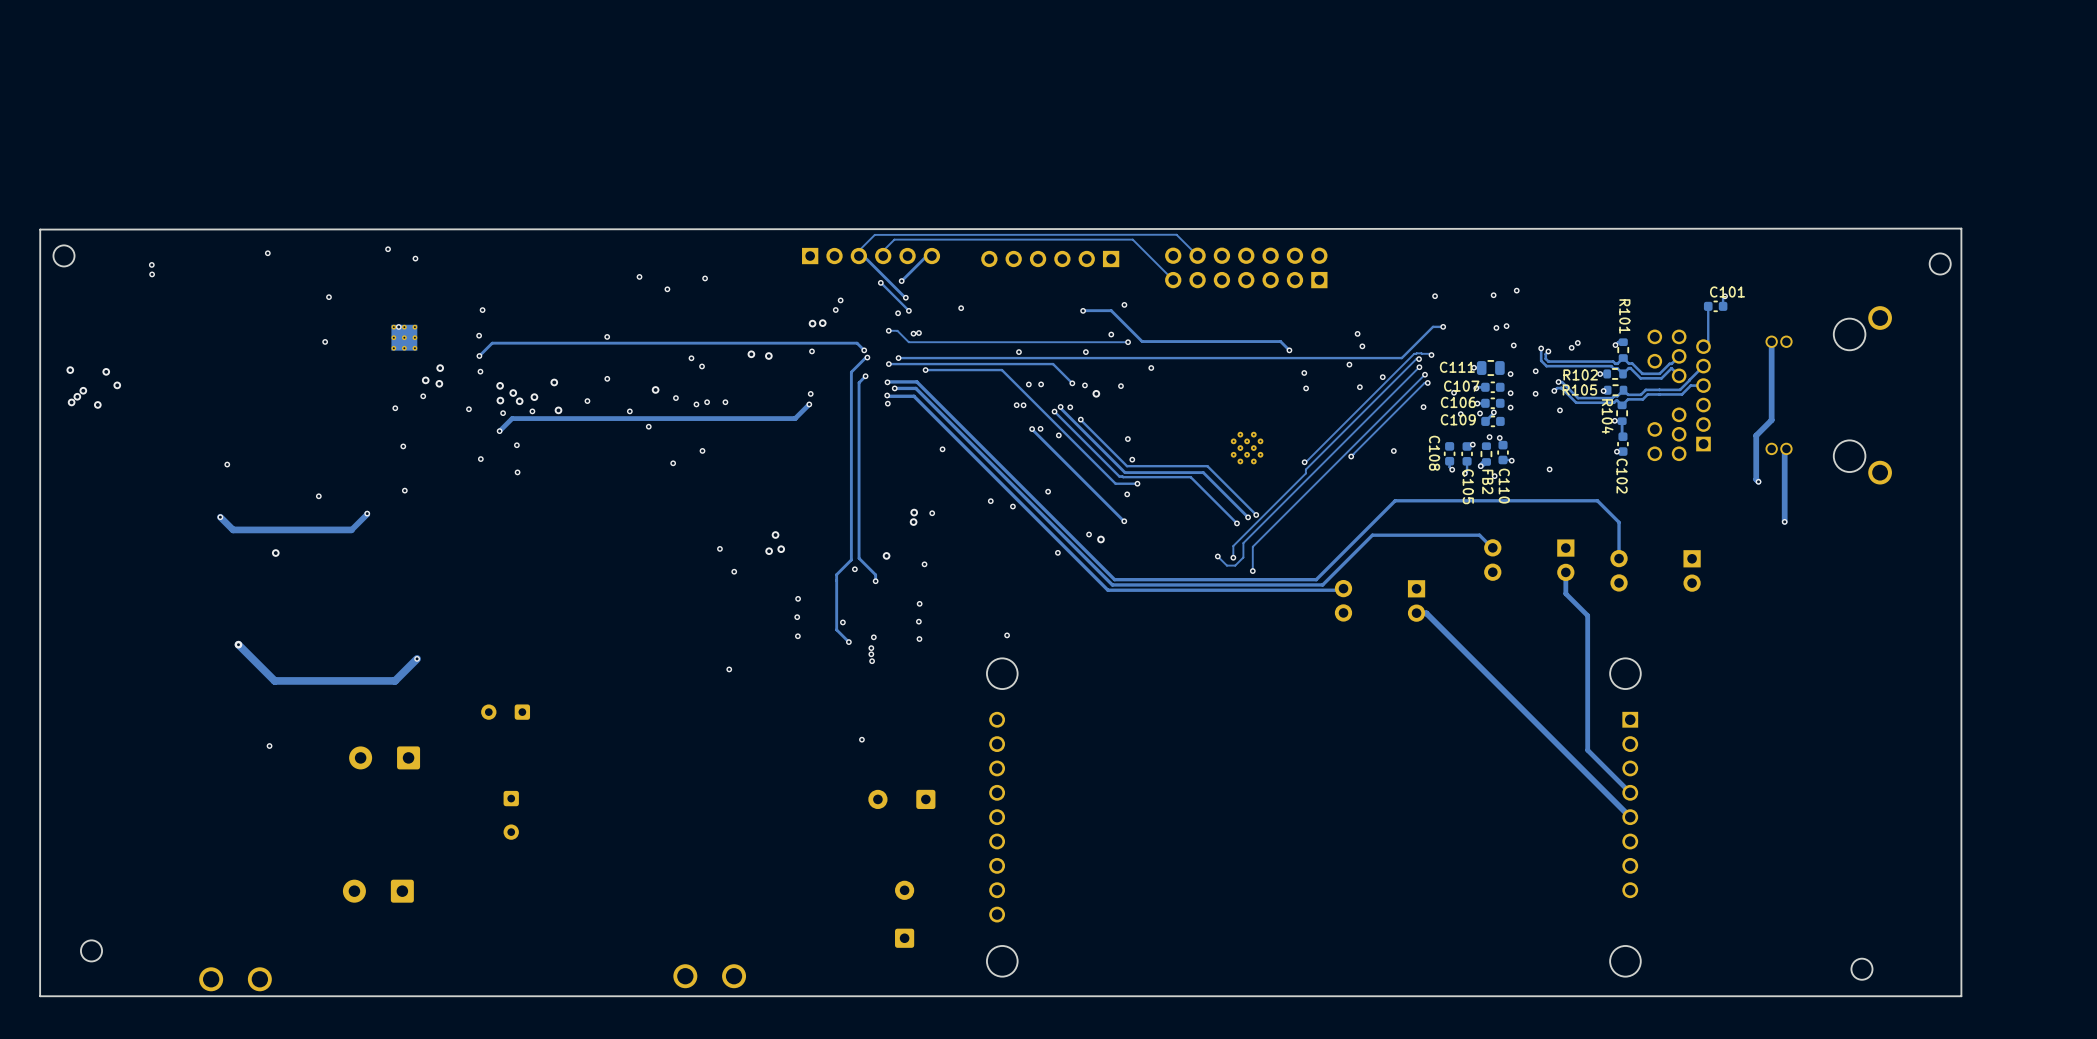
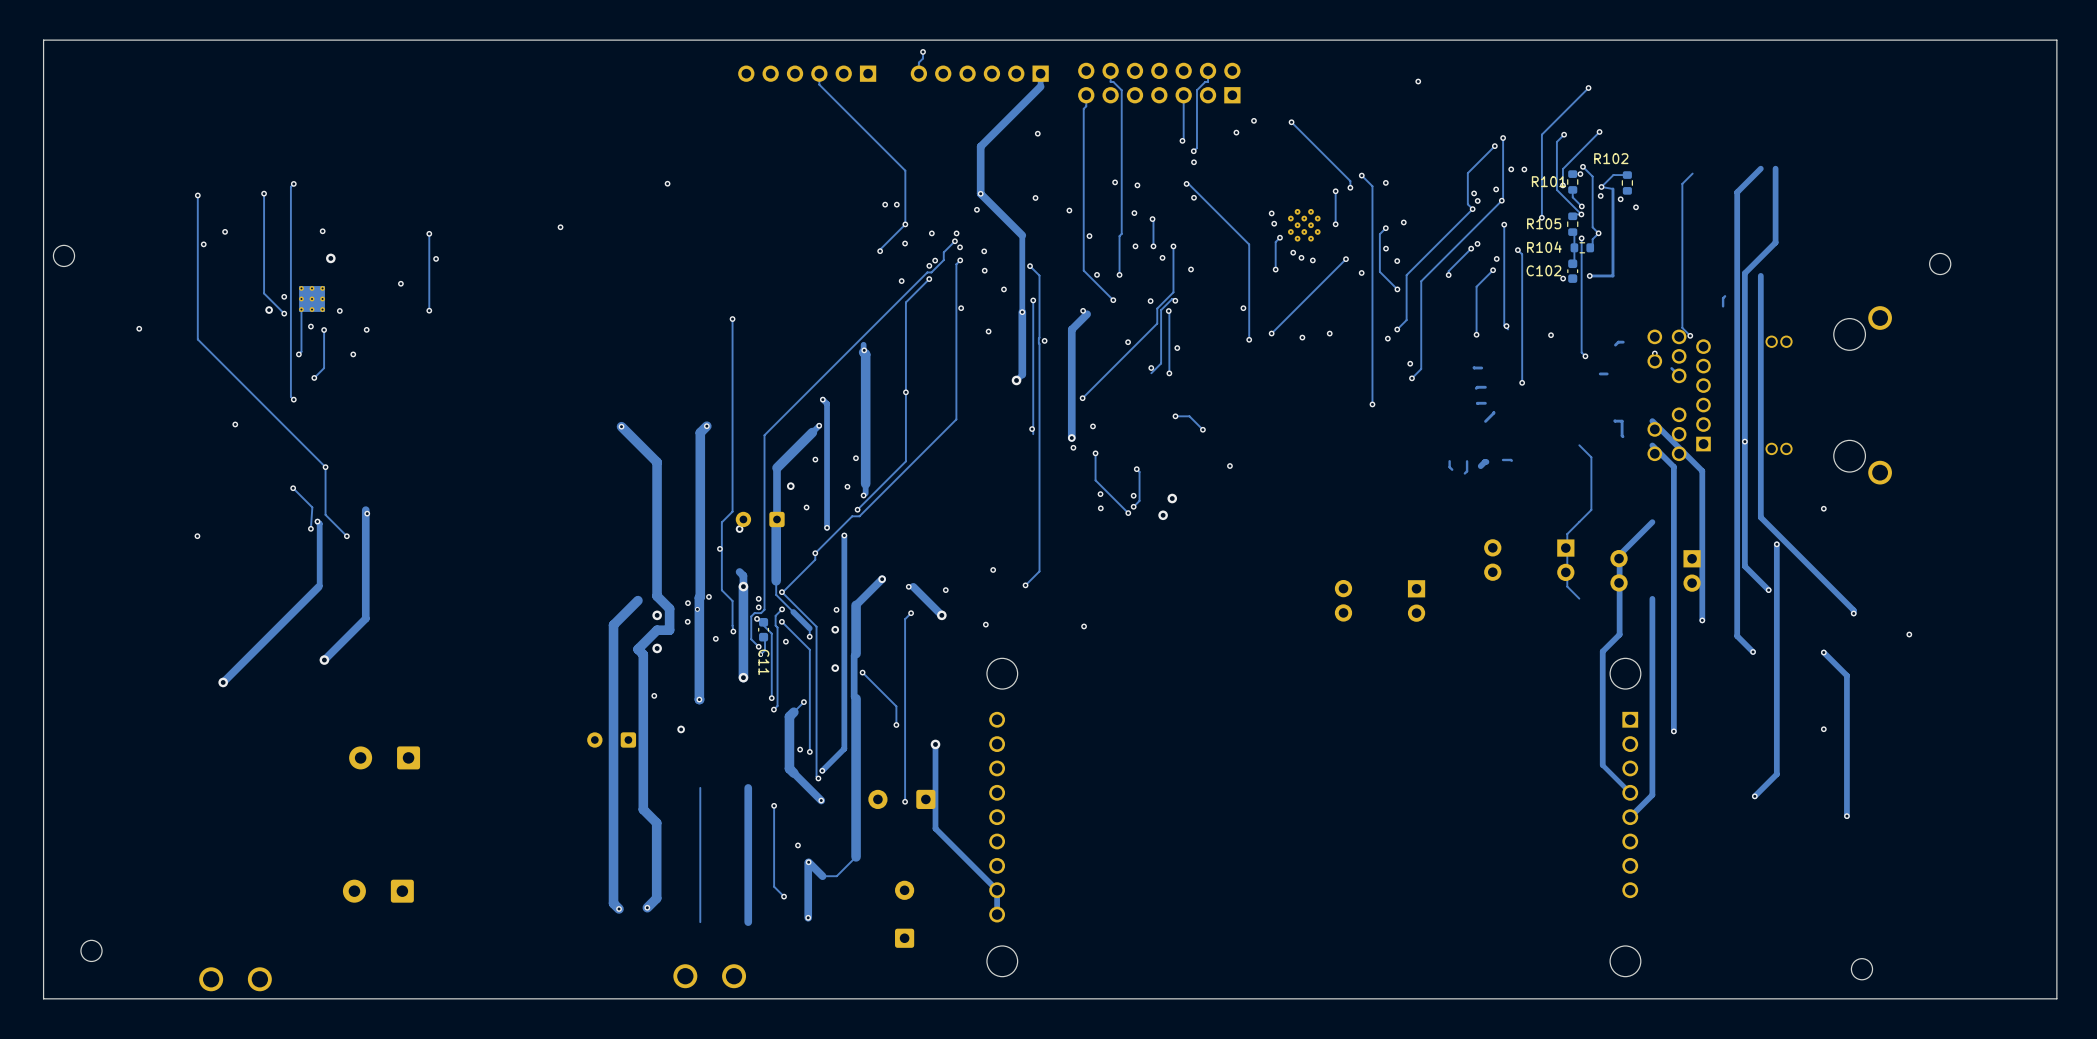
track: none -> (923, 51) (923, 58) (918, 62) (918, 73)
via: none -> (923, 51)
track: none -> (1110, 70) (1110, 81) (1113, 81) (1121, 90) (1121, 233) (1119, 236) (1119, 274)
track: none -> (1208, 70) (1208, 81) (1205, 81) (1196, 90) (1196, 148) (1193, 151)
part: none -> (807, 73)
track: none -> (819, 73) (819, 84) (905, 170) (905, 224) (880, 251)
part: none -> (979, 73)
track: none -> (1040, 73) (1040, 86) (980, 146) (980, 193) (1022, 235) (1022, 374) (1016, 380)
via: none -> (1418, 81)
track: none -> (1588, 88) (1541, 134) (1541, 217)
via: none -> (1588, 88)
track: none -> (1086, 95) (1086, 106) (1083, 108) (1083, 270) (1113, 300)
track: none -> (1183, 95) (1182, 140)
via: none -> (1253, 120)
track: none -> (1291, 122) (1350, 181) (1350, 187)
via: none -> (1291, 122)
track: none -> (1599, 131) (1562, 169) (1562, 185)
via: none -> (1599, 131)
via: none -> (1236, 132)
via: none -> (1037, 133)
track: none -> (1564, 134) (1556, 141) (1556, 189) (1581, 214) (1572, 216)
via: none -> (1564, 134)
track: none -> (1503, 138) (1503, 199) (1421, 281) (1421, 369) (1411, 378)
via: none -> (1503, 138)
via: none -> (1182, 140)
track: none -> (1494, 146) (1467, 173) (1467, 204) (1472, 209) (1406, 275) (1406, 320) (1397, 329)
via: none -> (1494, 146)
via: none -> (1193, 151)
via: none -> (1193, 162)
track: none -> (1582, 166) (1592, 176) (1592, 227) (1598, 233) (1592, 239) (1592, 245) (1590, 247)
via: none -> (1582, 166)
track: none -> (1760, 168) (1737, 192) (1737, 636) (1753, 651)
track: none -> (1775, 168) (1775, 242) (1744, 273) (1744, 566) (1768, 590)
via: none -> (1511, 169)
via: none -> (1524, 169)
track: none -> (1692, 173) (1682, 183) (1682, 327) (1690, 335)
via: none -> (1580, 174)
track: none -> (1361, 175) (1372, 186) (1372, 404)
via: none -> (1361, 175)
track: none -> (1627, 175) (1613, 175) (1601, 186) (1612, 188) (1612, 275) (1589, 275)
via: none -> (1115, 182)
via: none -> (1385, 182)
track: none -> (293, 183) (290, 186) (290, 396) (293, 399)
via: none -> (293, 183)
via: none -> (667, 183)
track: none -> (1186, 183) (1249, 244) (1249, 339)
via: none -> (1186, 183)
via: none -> (1137, 185)
via: none -> (1562, 185)
via: none -> (1601, 186)
via: none -> (1350, 187)
via: none -> (1496, 189)
track: none -> (1572, 189) (1572, 197) (1581, 206)
track: none -> (1335, 191) (1335, 224)
via: none -> (1335, 191)
track: none -> (264, 193) (264, 293) (284, 313)
via: none -> (264, 193)
via: none -> (980, 193)
via: none -> (1474, 193)
track: none -> (197, 195) (197, 339) (325, 467) (325, 514) (346, 536)
via: none -> (197, 195)
via: none -> (1600, 195)
via: none -> (1035, 197)
via: none -> (1193, 197)
via: none -> (1620, 199)
via: none -> (1477, 200)
via: none -> (1501, 200)
via: none -> (885, 204)
via: none -> (896, 204)
via: none -> (1581, 206)
via: none -> (1636, 207)
via: none -> (976, 209)
via: none -> (1472, 209)
via: none -> (1069, 210)
via: none -> (1134, 213)
via: none -> (1271, 213)
via: none -> (1581, 214)
via: none -> (1541, 217)
track: none -> (1152, 219) (1153, 246)
via: none -> (1152, 219)
via: none -> (1403, 222)
via: none -> (1274, 223)
via: none -> (905, 224)
via: none -> (1335, 224)
track: none -> (1504, 224) (1504, 325) (1508, 329)
via: none -> (1504, 224)
via: none -> (560, 227)
track: none -> (1385, 228) (1379, 234) (1379, 271) (1397, 289)
via: none -> (1385, 228)
board edge: (1961, 228) (40, 229) (40, 996) (1961, 996) (1961, 228) -> (2056, 40) (2056, 998) (43, 998) (43, 40) (2056, 40)
via: none -> (225, 231)
via: none -> (322, 231)
track: none -> (1572, 232) (1574, 233) (1574, 262) (1572, 263)
track: none -> (429, 233) (429, 310)
via: none -> (429, 233)
via: none -> (931, 233)
via: none -> (956, 233)
via: none -> (1598, 233)
via: none -> (1089, 236)
track: none -> (1279, 237) (1275, 242) (1275, 269)
via: none -> (1279, 237)
track: none -> (1581, 238) (1581, 352) (1585, 356)
via: none -> (1581, 238)
track: none -> (954, 241) (943, 252) (943, 260) (931, 272) (927, 272) (764, 435) (764, 609) (751, 616) (751, 639) (758, 646)
via: none -> (954, 241)
via: none -> (905, 243)
via: none -> (1477, 243)
via: none -> (203, 244)
via: none -> (1135, 246)
via: none -> (1153, 246)
track: none -> (1173, 246) (1173, 292) (1157, 308) (1157, 323) (1082, 398)
via: none -> (1173, 246)
via: none -> (960, 247)
via: none -> (1386, 248)
track: none -> (1471, 248) (1448, 271) (1448, 275)
via: none -> (1471, 248)
via: (388, 249) -> none
track: none -> (1517, 250) (1522, 254) (1522, 382)
via: none -> (1517, 250)
via: none -> (880, 251)
via: none -> (984, 251)
via: none -> (1293, 252)
via: (267, 253) -> none
track: (1197, 255) (1176, 234) (874, 234) (858, 250) (858, 256) (863, 256) (905, 297) -> none
part: (871, 256) -> none
track: (883, 256) (883, 250) (894, 239) (1132, 239) (1173, 280) -> none
track: (931, 256) (926, 256) (901, 281) -> none
via: none -> (1162, 257)
via: none -> (1301, 257)
via: none -> (330, 258)
via: (415, 258) -> none
via: none -> (436, 258)
part: (1050, 258) -> none
via: none -> (1496, 258)
track: none -> (1346, 259) (1271, 333)
via: none -> (1346, 259)
via: none -> (935, 260)
track: none -> (960, 260) (956, 264) (956, 419) (859, 516) (852, 516) (815, 553) (815, 559) (781, 592) (816, 626) (816, 776) (818, 778)
via: none -> (960, 260)
via: none -> (1312, 260)
via: none -> (1397, 261)
via: (151, 264) -> none
via: none -> (929, 265)
track: none -> (1030, 266) (1039, 275) (1039, 571) (1025, 585)
via: none -> (1030, 266)
part position: (1246, 267) -> (1159, 83)
via: none -> (1191, 269)
via: none -> (1275, 269)
via: none -> (984, 270)
track: none -> (1493, 270) (1476, 286) (1476, 334)
via: none -> (1493, 270)
via: none -> (1361, 272)
via: (152, 274) -> none
via: none -> (1097, 274)
via: none -> (1119, 274)
via: none -> (1448, 275)
via: none -> (1589, 275)
track: none -> (1760, 275) (1760, 517) (1853, 610) (1853, 613)
via: (639, 276) -> none
via: (705, 278) -> none
via: none -> (1563, 278)
track: none -> (929, 279) (905, 302) (905, 461) (857, 509)
via: none -> (929, 279)
via: (880, 282) -> none
track: (881, 282) (908, 310) -> none
via: none -> (400, 283)
via: (667, 289) -> none
via: none -> (1003, 289)
via: none -> (1397, 289)
via: (1516, 290) -> none
via: (1493, 295) -> none
via: none -> (284, 296)
via: (1435, 296) -> none
via: (1725, 296) -> none
via: (328, 297) -> none
via: (905, 297) -> none
via: (840, 300) -> none
track: none -> (1033, 300) (1033, 434)
via: none -> (1033, 300)
track: none -> (1175, 300) (1172, 298) (1161, 310) (1161, 363) (1151, 373)
via: none -> (1175, 300)
via: none -> (1150, 301)
via position: (1124, 304) -> (1113, 300)
track: (1708, 306) (1708, 341) (1703, 346) -> none
C101: (1715, 306) -> none
via: none -> (1243, 308)
track: none -> (301, 309) (301, 351) (298, 354)
via: none -> (269, 310)
via: none -> (339, 310)
via: none -> (429, 310)
via: (482, 310) -> none
via: (835, 310) -> none
via: (908, 310) -> none
track: (1083, 310) (1111, 310) (1142, 341) (1280, 341) (1289, 350) -> none
track: none -> (1168, 311) (1169, 373)
via: none -> (1168, 311)
via: none -> (1022, 312)
via: none -> (284, 313)
via: (898, 313) -> none
track: none -> (1087, 314) (1071, 329) (1071, 437)
R101 name rotation: 0° (1624, 316) -> 90° counterclockwise (1548, 181)
track: none -> (732, 319) (732, 511) (721, 522) (721, 590) (732, 600) (733, 631)
via: none -> (732, 319)
via: (812, 323) -> none
via: (822, 323) -> none
via: none -> (310, 326)
via: (398, 326) -> none
track: (1443, 326) (1433, 326) (1401, 358) (898, 358) -> none
via: (1443, 326) -> none
via: (1496, 327) -> none
via: none -> (139, 328)
via: none -> (366, 329)
via: none -> (1397, 329)
track: none -> (324, 330) (324, 368) (314, 377)
via: none -> (324, 330)
track: (888, 330) (897, 330) (908, 342) (1128, 342) -> none
via: (888, 330) -> none
via: none -> (988, 331)
via: (913, 333) -> none
via: (918, 333) -> none
via: none -> (1271, 333)
via: none -> (1329, 333)
via: (1357, 333) -> none
via: (1111, 334) -> none
via: none -> (1476, 334)
via: (479, 335) -> none
via: none -> (1551, 335)
via: none -> (1690, 335)
via: (607, 336) -> none
part position: (404, 337) -> (312, 298)
via: none -> (1302, 337)
via: none -> (1387, 338)
via: none -> (1249, 339)
via: none -> (1044, 340)
via: (325, 341) -> none
track: (1771, 341) (1771, 420) (1756, 435) (1756, 479) (1758, 481) -> none
via: (1577, 342) -> none
track: none -> (863, 344) (863, 352) (865, 354) (865, 493) (863, 495)
via: (1513, 345) -> none
via: (1615, 345) -> none
via: (1362, 346) -> none
via: (1571, 347) -> none
via: none -> (1177, 348)
track: (1541, 348) (1541, 360) (1546, 366) (1611, 366) (1617, 368) (1623, 373) (1630, 368) (1640, 378) (1661, 378) (1671, 368) -> none
via: (1541, 348) -> none
track: (864, 350) (857, 343) (492, 343) (479, 356) -> none
via: (1289, 350) -> none
R101 position: (1623, 350) -> (1572, 182)
via: (811, 351) -> none
track: (1548, 351) (1545, 354) (1545, 358) (1548, 361) (1613, 361) (1617, 363) (1623, 357) (1642, 373) (1659, 373) (1679, 356) -> none
via: (1548, 351) -> none
via: (1018, 352) -> none
via: (1085, 352) -> none
via: none -> (1654, 353)
via: none -> (298, 354)
via: none -> (353, 354)
via: (751, 354) -> none
track: (1431, 355) (1414, 353) (1304, 462) -> none
via: (1431, 355) -> none
via: (479, 356) -> none
via: (768, 356) -> none
via: none -> (1585, 356)
track: (867, 357) (851, 372) (851, 559) (836, 574) (836, 629) (848, 642) -> none
via: (867, 357) -> none
via: (691, 358) -> none
via: (898, 358) -> none
track: (1419, 359) (1416, 359) (1305, 469) (1305, 473) (1233, 546) (1233, 557) -> none
via: (1419, 359) -> none
via: none -> (1410, 363)
track: (888, 364) (1053, 364) (1072, 383) -> none
via: (888, 364) -> none
via: (1349, 364) -> none
via: (702, 366) -> none
track: (1703, 366) (1680, 389) (1645, 389) (1640, 394) (1628, 394) (1623, 390) (1612, 398) (1578, 398) (1562, 382) (1558, 382) -> none
track: (1419, 367) (1243, 543) (1243, 557) (1235, 565) (1226, 565) (1217, 556) -> none
via: (1419, 367) -> none
via: (1473, 367) -> none
via: (440, 368) -> none
C111: (1490, 368) -> none
via: (70, 370) -> none
track: (925, 370) (1001, 370) (1115, 483) (1137, 483) -> none
via: (925, 370) -> none
via: (106, 371) -> none
via: (480, 371) -> none
via: (1535, 371) -> none
via: (1304, 372) -> none
via: none -> (1169, 373)
R102 rotation: 0° (1615, 373) -> 90° clockwise (1627, 182)
R102 position: (1615, 373) -> (1627, 182)
track: (1424, 374) (1252, 546) (1252, 571) -> none
via: (1424, 374) -> none
via: (1510, 374) -> none
via: (1600, 374) -> none
track: (865, 376) (859, 382) (859, 558) (875, 574) (875, 581) -> none
via: (865, 376) -> none
via: none -> (314, 377)
via: (1382, 377) -> none
via: (607, 378) -> none
via: none -> (1411, 378)
via: (425, 380) -> none
via: none -> (1016, 380)
via: (554, 382) -> none
track: (887, 382) (916, 381) (1114, 579) (1316, 579) (1395, 500) (1597, 500) (1619, 522) (1619, 558) -> none
via: (887, 382) -> none
track: (1427, 382) (1424, 382) (1353, 454) -> none
via: (1427, 382) -> none
via: none -> (1522, 382)
via: (1558, 382) -> none
via: (439, 383) -> none
via: (1072, 383) -> none
via: (1028, 384) -> none
via: (1041, 384) -> none
via: (117, 385) -> none
via: (500, 385) -> none
via: (1084, 385) -> none
track: (1703, 385) (1690, 385) (1681, 394) (1647, 394) (1642, 399) (1628, 399) (1622, 405) (1617, 400) (1614, 402) (1576, 402) (1561, 387) (1554, 390) -> none
via: (1120, 386) -> none
via: (1359, 387) -> none
C107: (1492, 387) -> none
track: (894, 388) (915, 388) (1112, 584) (1322, 584) (1372, 535) (1479, 535) (1492, 547) -> none
via: (894, 388) -> none
via: (1306, 388) -> none
via: (1476, 388) -> none
via: (655, 389) -> none
via: (83, 390) -> none
via: (1554, 390) -> none
R105 rotation: 0° (1615, 390) -> 90° clockwise (1572, 224)
R105 position: (1615, 390) -> (1572, 224)
via: (1603, 391) -> none
via: none -> (905, 392)
via: (1454, 392) -> none
via: (513, 393) -> none
via: (810, 393) -> none
via position: (1096, 393) -> (1071, 437)
via: (1510, 393) -> none
via: (1535, 393) -> none
track: (887, 395) (913, 396) (1107, 590) (1341, 590) (1343, 588) -> none
via: (887, 395) -> none
via: (77, 396) -> none
via: (423, 396) -> none
via: (534, 397) -> none
via: (675, 398) -> none
via: none -> (1082, 398)
via: none -> (293, 399)
track: none -> (822, 399) (827, 403) (827, 527)
via: none -> (822, 399)
via: (500, 400) -> none
via: (519, 401) -> none
via: (587, 401) -> none
via: (71, 402) -> none
via: (707, 402) -> none
via: (725, 402) -> none
via: (887, 403) -> none
via: (1477, 403) -> none
C106: (1492, 403) -> none
via: (97, 404) -> none
via: (696, 404) -> none
track: (809, 404) (795, 418) (512, 418) (499, 431) -> none
via: (809, 404) -> none
via: none -> (1372, 404)
via: (1016, 405) -> none
via: (1023, 405) -> none
track: (1060, 406) (1125, 472) (1203, 472) (1248, 517) -> none
via: (1060, 406) -> none
via: (1070, 407) -> none
via: (1423, 407) -> none
via: (1510, 407) -> none
via: (395, 408) -> none
via: (468, 409) -> none
via: (558, 410) -> none
via: (1559, 410) -> none
via: (532, 411) -> none
via: (629, 411) -> none
track: (1054, 411) (1119, 476) (1190, 477) (1236, 523) -> none
via: (1054, 411) -> none
via: (1493, 412) -> none
via: (503, 413) -> none
via: (1480, 413) -> none
R104 rotation: 0° (1622, 413) -> 90° clockwise (1582, 247)
R104 position: (1622, 413) -> (1582, 247)
via: (1460, 414) -> none
track: none -> (1175, 416) (1189, 416) (1202, 429)
via: none -> (1175, 416)
R104 name position: R104 (1607, 416) -> R104 (1544, 247)
track: (1080, 419) (1127, 466) (1207, 466) (1256, 514) -> none
via: (1080, 419) -> none
via: (1614, 420) -> none
C109: (1492, 421) -> none
track: none -> (1652, 421) (1702, 471) (1702, 620)
via: none -> (235, 424)
track: none -> (819, 425) (776, 467) (776, 594) (809, 628) (809, 636)
via: none -> (819, 425)
track: none -> (621, 426) (657, 462) (657, 596) (669, 608) (669, 630) (657, 630) (637, 649) (643, 654) (643, 809) (656, 822) (656, 898) (647, 907)
via: none -> (621, 426)
via: (648, 426) -> none
track: none -> (706, 426) (700, 432) (699, 699)
via: none -> (706, 426)
via: none -> (1092, 426)
via: (1040, 428) -> none
track: (1032, 429) (1124, 521) -> none
via: none -> (1202, 429)
via: (499, 431) -> none
via: (1058, 435) -> none
via: (1489, 437) -> none
via: (1499, 437) -> none
via: (1127, 439) -> none
via: none -> (1744, 441)
via: (1472, 444) -> none
C102 position: (1622, 444) -> (1572, 271)
via: (516, 445) -> none
track: none -> (1579, 445) (1591, 457) (1591, 509) (1567, 534) (1567, 586) (1579, 598)
track: none -> (1652, 445) (1673, 466) (1673, 731)
via: (403, 446) -> none
via: none -> (1073, 447)
part position: (1247, 448) -> (1304, 225)
track: (1786, 448) (1784, 450) (1784, 521) -> none
via: (942, 449) -> none
via: (702, 450) -> none
via: (1393, 451) -> none
via: (1616, 451) -> none
C110: (1503, 452) -> none
track: none -> (1095, 453) (1095, 480) (1128, 513)
via: none -> (1095, 453)
C108: (1449, 453) -> none
C105: (1467, 453) -> none
FB2: (1486, 454) -> none
via: (1351, 456) -> none
via: none -> (855, 458)
via: (480, 459) -> none
via: none -> (815, 459)
via: (1132, 459) -> none
via: (1511, 460) -> none
via: (1304, 462) -> none
via: (673, 463) -> none
via: (227, 464) -> none
via: none -> (1229, 466)
via: (1480, 466) -> none
via: none -> (325, 467)
track: none -> (1136, 469) (1139, 471) (1139, 500) (1133, 506)
via: none -> (1136, 469)
via: (1452, 469) -> none
via: (1549, 469) -> none
via: (517, 472) -> none
via: (1464, 473) -> none
via: (1494, 476) -> none
C102 name rotation: 0° (1622, 476) -> 90° counterclockwise (1543, 270)
via: (1758, 481) -> none
via: (1137, 483) -> none
via: none -> (790, 486)
via: none -> (847, 486)
track: none -> (293, 488) (312, 507) (310, 528)
via: none -> (293, 488)
via: (404, 490) -> none
via: (1048, 491) -> none
via: none -> (1100, 494)
via: (1127, 494) -> none
via: none -> (863, 495)
via: none -> (1133, 495)
via: (318, 496) -> none
via: none -> (1172, 498)
via: (990, 501) -> none
via: (1012, 506) -> none
via: none -> (1133, 506)
via: none -> (806, 507)
via: none -> (1100, 508)
via: none -> (1823, 508)
via: none -> (857, 509)
track: none -> (365, 510) (365, 618) (324, 660)
via: (914, 512) -> none
track: (367, 513) (351, 529) (233, 529) (220, 517) -> none
via: (932, 513) -> none
via: none -> (1128, 513)
via: (1256, 514) -> none
via: none -> (1163, 515)
via position: (220, 517) -> (197, 536)
via: (1248, 517) -> none
part: none -> (760, 519)
track: none -> (317, 521) (319, 523) (319, 585) (223, 682)
via: none -> (317, 521)
via: (1124, 521) -> none
via: (1784, 521) -> none
via: (913, 522) -> none
via: (1236, 523) -> none
via: none -> (827, 527)
via: none -> (310, 528)
via: none -> (739, 529)
via: (1089, 534) -> none
via: (775, 535) -> none
track: none -> (844, 535) (844, 748) (822, 770)
via: none -> (844, 535)
via: none -> (346, 536)
via: (1100, 539) -> none
track: none -> (1776, 544) (1776, 774) (1754, 796)
via: none -> (1776, 544)
via: (781, 549) -> none
via: (769, 551) -> none
via: (1057, 552) -> none
via: (275, 553) -> none
via: none -> (815, 553)
via position: (886, 555) -> (882, 579)
via: (1217, 556) -> none
via: (1233, 557) -> none
via: (924, 564) -> none
via: (854, 569) -> none
via: none -> (993, 569)
via: (734, 571) -> none
track: none -> (739, 571) (743, 575) (743, 677)
via: (1252, 571) -> none
track: (1565, 572) (1565, 593) (1587, 615) (1587, 750) (1602, 765) -> (1652, 522) (1619, 554) (1619, 634) (1602, 651) (1602, 765)
track: none -> (882, 579) (856, 605) (856, 653) (854, 655) (856, 856) (836, 876) (822, 876) (808, 862) (808, 917)
via: (875, 581) -> none
via: none -> (1025, 585)
via: none -> (743, 586)
track: none -> (908, 586) (913, 586) (941, 615)
via: none -> (908, 586)
via: none -> (945, 590)
via: none -> (1768, 590)
via: none -> (781, 592)
via: none -> (708, 596)
via: none -> (758, 598)
via: (798, 598) -> none
track: none -> (637, 600) (613, 625) (613, 903) (619, 908)
via: none -> (687, 603)
via: (919, 603) -> none
via: none -> (758, 607)
via: none -> (697, 609)
track: none -> (782, 609) (775, 615) (775, 625) (777, 627) (777, 705) (773, 709)
via: none -> (782, 609)
track: none -> (911, 613) (905, 619) (905, 801)
via: none -> (911, 613)
track: (1416, 613) (1426, 613) (1630, 817) -> (1652, 598) (1652, 795) (1630, 817)
via: none -> (1853, 613)
via: none -> (657, 615)
via: none -> (941, 615)
via: (797, 617) -> none
via: none -> (757, 618)
via: none -> (1702, 620)
via: none -> (687, 621)
track: none -> (781, 621) (809, 649) (809, 751)
via: none -> (781, 621)
via: (918, 621) -> none
track: none -> (763, 622) (757, 618) (771, 633) (771, 698)
via position: (842, 622) -> (836, 609)
via: none -> (1084, 626)
C11: none -> (763, 629)
via: none -> (835, 629)
via: none -> (733, 631)
via: none -> (1909, 634)
via position: (1007, 635) -> (985, 624)
via: (797, 636) -> none
via: none -> (809, 636)
track: none -> (763, 637) (765, 650) (760, 654)
via: (873, 637) -> none
via: none -> (715, 638)
via: (919, 639) -> none
via: none -> (785, 641)
via: (848, 642) -> none
track: (238, 644) (274, 680) (395, 680) (417, 658) -> none
via: (238, 644) -> none
via: none -> (758, 646)
via: none -> (657, 648)
via: (871, 648) -> none
via: none -> (1753, 651)
track: none -> (1823, 652) (1846, 675) (1846, 816)
via: none -> (1823, 652)
via: none -> (760, 654)
via: (871, 654) -> none
via: (417, 658) -> none
via: none -> (324, 660)
via: (872, 661) -> none
via: none -> (835, 668)
via: (729, 669) -> none
track: none -> (862, 672) (896, 706) (896, 724)
via: none -> (862, 672)
via: none -> (743, 677)
via: none -> (223, 682)
via: none -> (654, 695)
via: none -> (771, 698)
via: none -> (699, 699)
track: none -> (803, 702) (789, 716) (789, 768) (821, 800)
via: none -> (803, 702)
via: none -> (773, 709)
part: (505, 712) -> none
via: none -> (896, 724)
via: none -> (681, 729)
via: none -> (1823, 729)
via: none -> (1673, 731)
part: none -> (611, 739)
via: (861, 739) -> none
track: none -> (935, 744) (935, 828) (997, 890) (997, 914)
via: none -> (935, 744)
via: (269, 746) -> none
via: none -> (800, 749)
via: none -> (809, 751)
via: none -> (822, 770)
via: none -> (818, 778)
track: none -> (700, 787) (700, 922)
track: none -> (748, 787) (748, 922)
via: none -> (1754, 796)
via: none -> (821, 800)
via: none -> (905, 801)
track: none -> (774, 805) (774, 886) (784, 896)
via: none -> (774, 805)
part: (511, 815) -> none
via: none -> (1846, 816)
via: none -> (797, 845)
via: none -> (808, 862)
via: none -> (784, 896)
via: none -> (647, 907)
via: none -> (619, 908)
via: none -> (808, 917)

